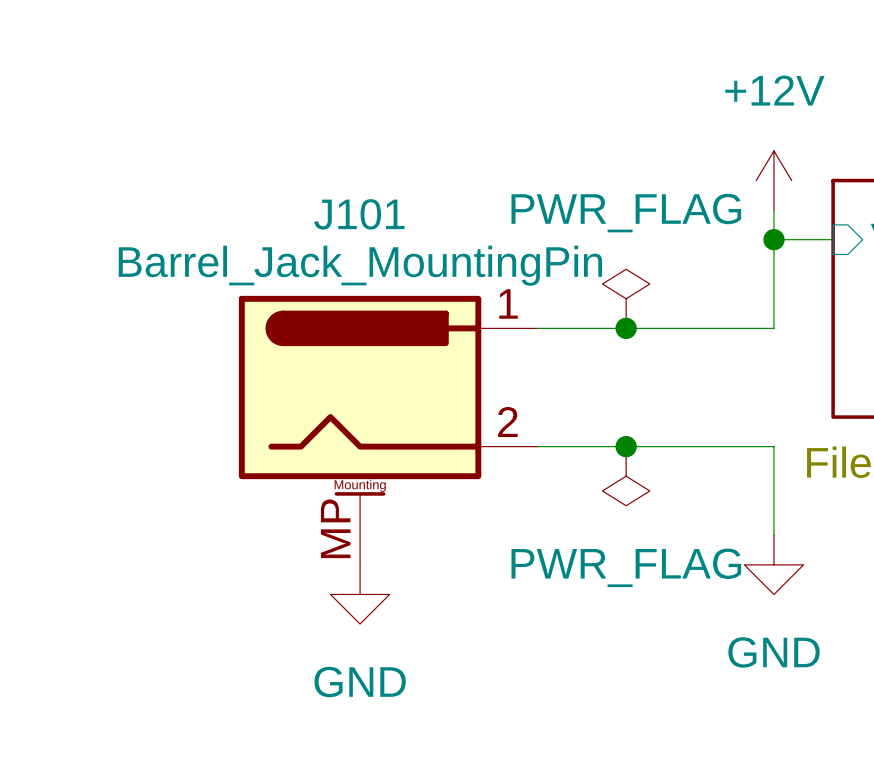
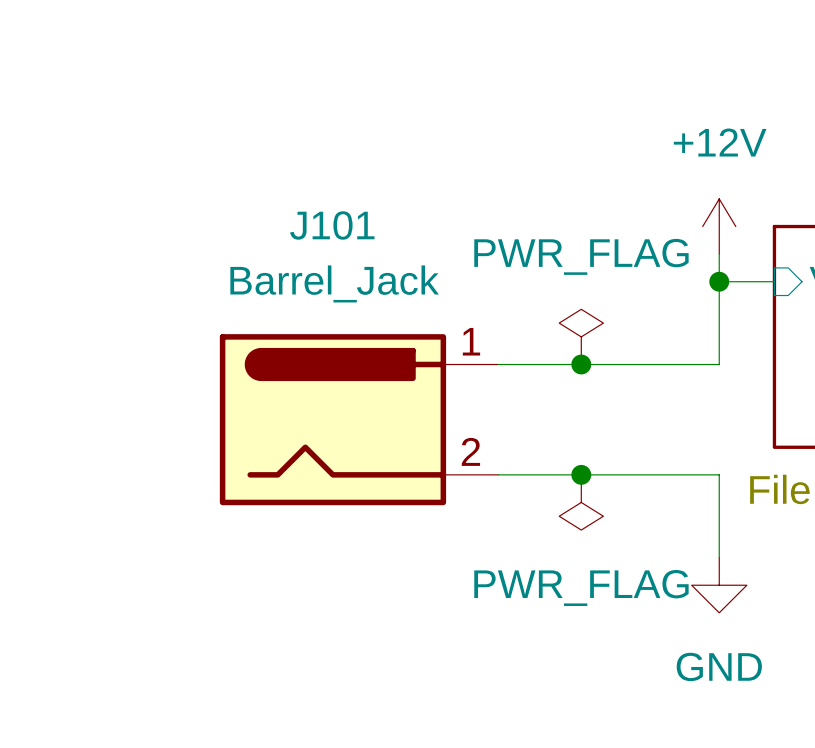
J101 value: Barrel_Jack_MountingPin (360, 265) -> Barrel_Jack (334, 283)
J101 symbol: [238, 295, 538, 565] -> [219, 334, 499, 506]
power symbol: GND (360, 594) -> none

